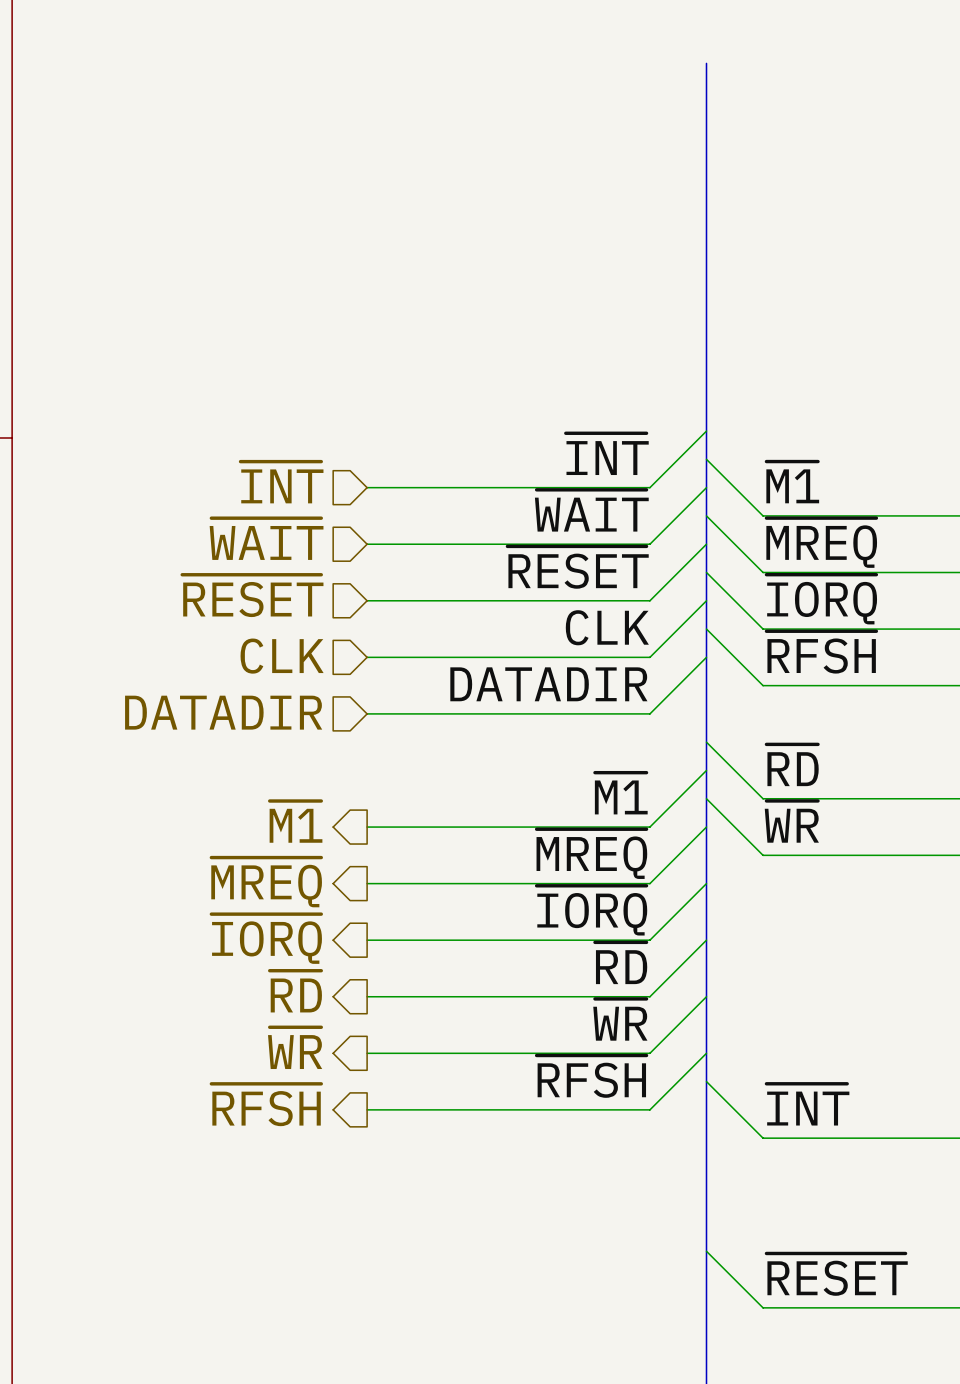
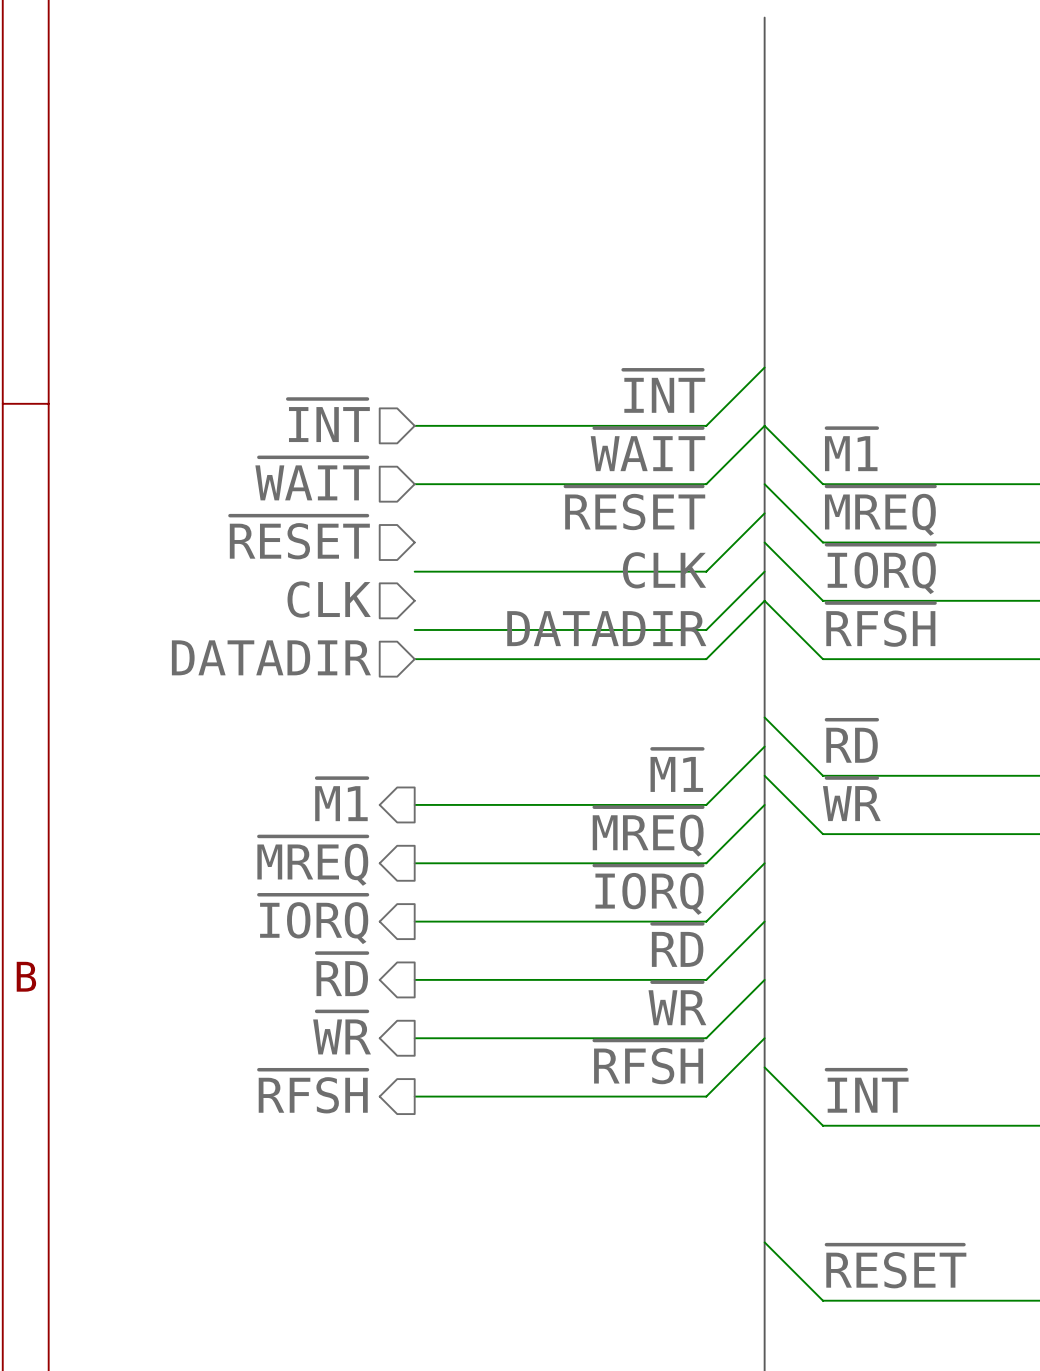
wire: (706, 431) (649, 487) (367, 487) -> (764, 367) (706, 425) (414, 425)
label position: ~{INT} (607, 454) -> ~{INT} (664, 391)
hierarchical label position: ~{INT} (282, 482) -> ~{INT} (328, 420)
wire: (706, 487) (649, 544) (367, 544) -> (764, 425) (706, 484) (414, 484)
label position: ~{WAIT} (591, 510) -> ~{WAIT} (647, 449)
hierarchical label position: ~{WAIT} (266, 539) -> ~{WAIT} (312, 478)
label position: ~{RESET} (578, 567) -> ~{RESET} (635, 508)
hierarchical label position: ~{RESET} (252, 595) -> ~{RESET} (299, 537)
label position: CLK (607, 627) -> CLK (664, 570)
hierarchical label position: CLK (282, 656) -> CLK (329, 599)
wire: (706, 657) (649, 713) (367, 713) -> (764, 600) (706, 659) (414, 659)
label position: DATADIR (548, 684) -> DATADIR (606, 628)
hierarchical label position: DATADIR (223, 712) -> DATADIR (271, 657)

